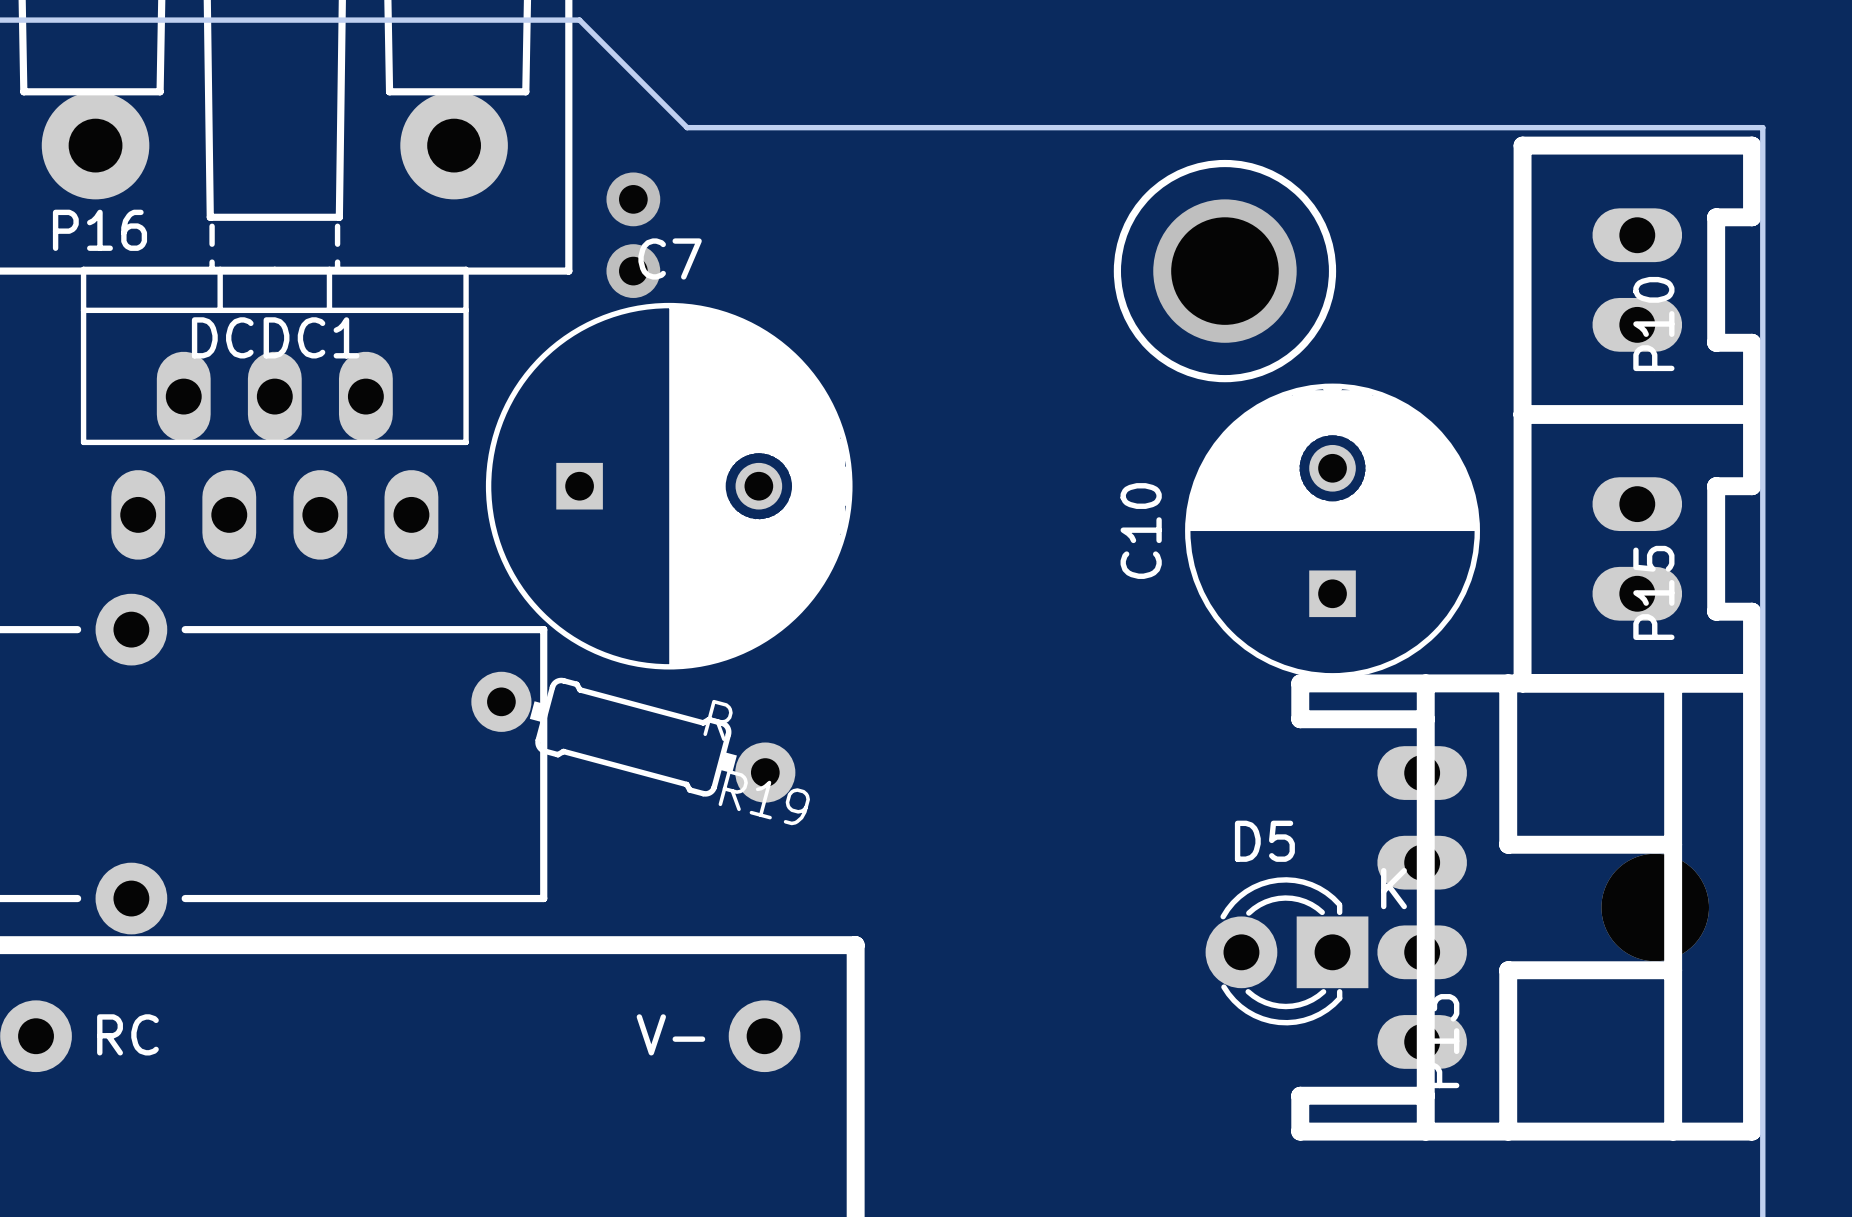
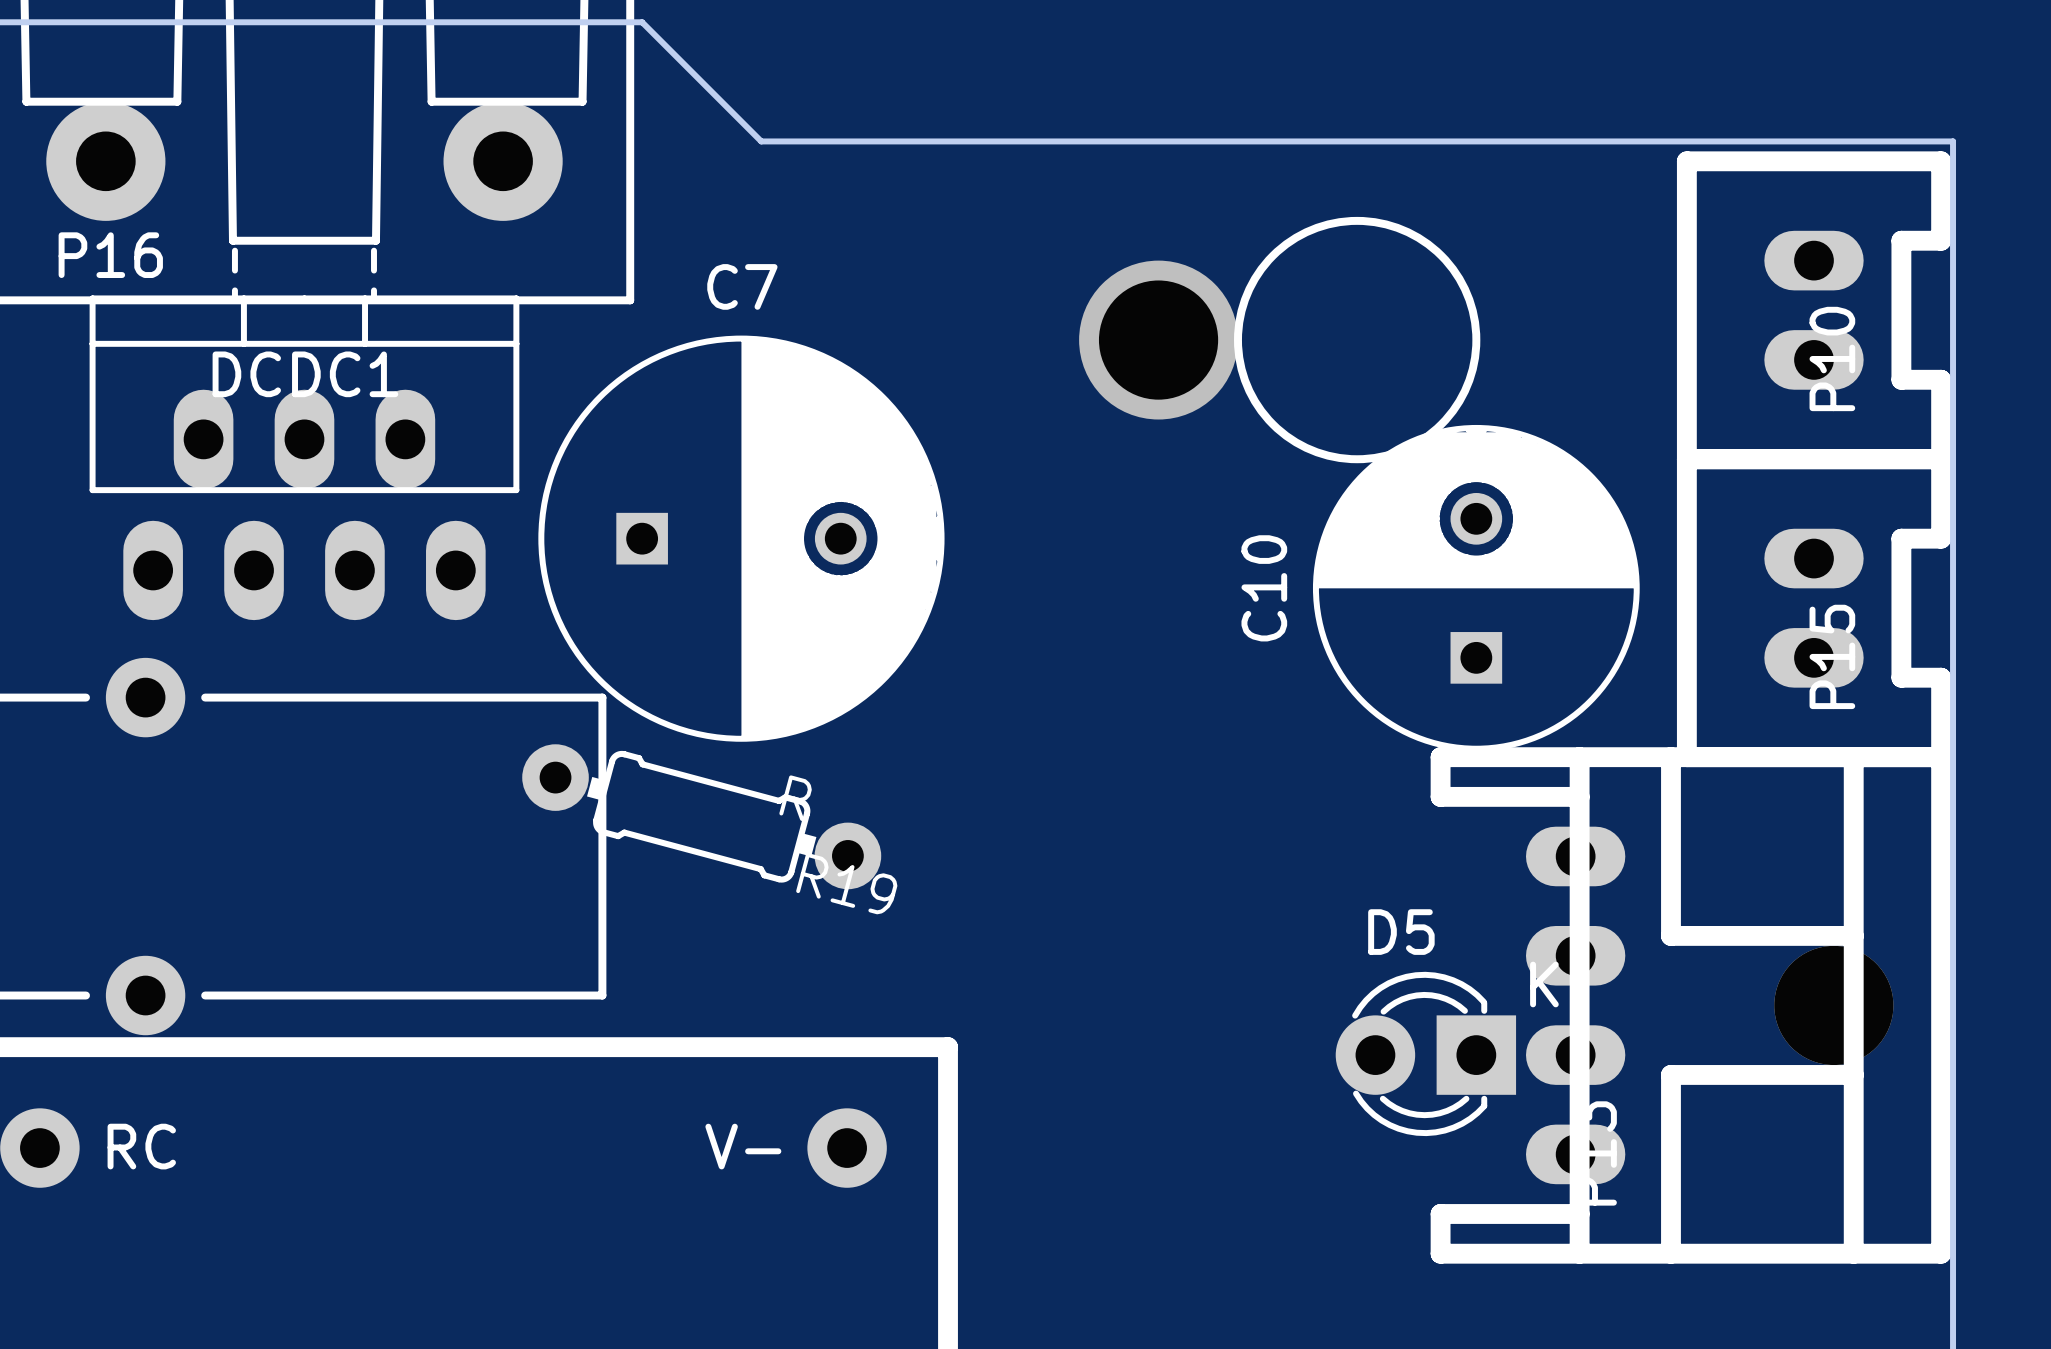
via: (633, 199) -> none
via: (633, 271) -> none
drawing position: (1224, 271) -> (1357, 340)
via position: (1224, 271) -> (1158, 340)

